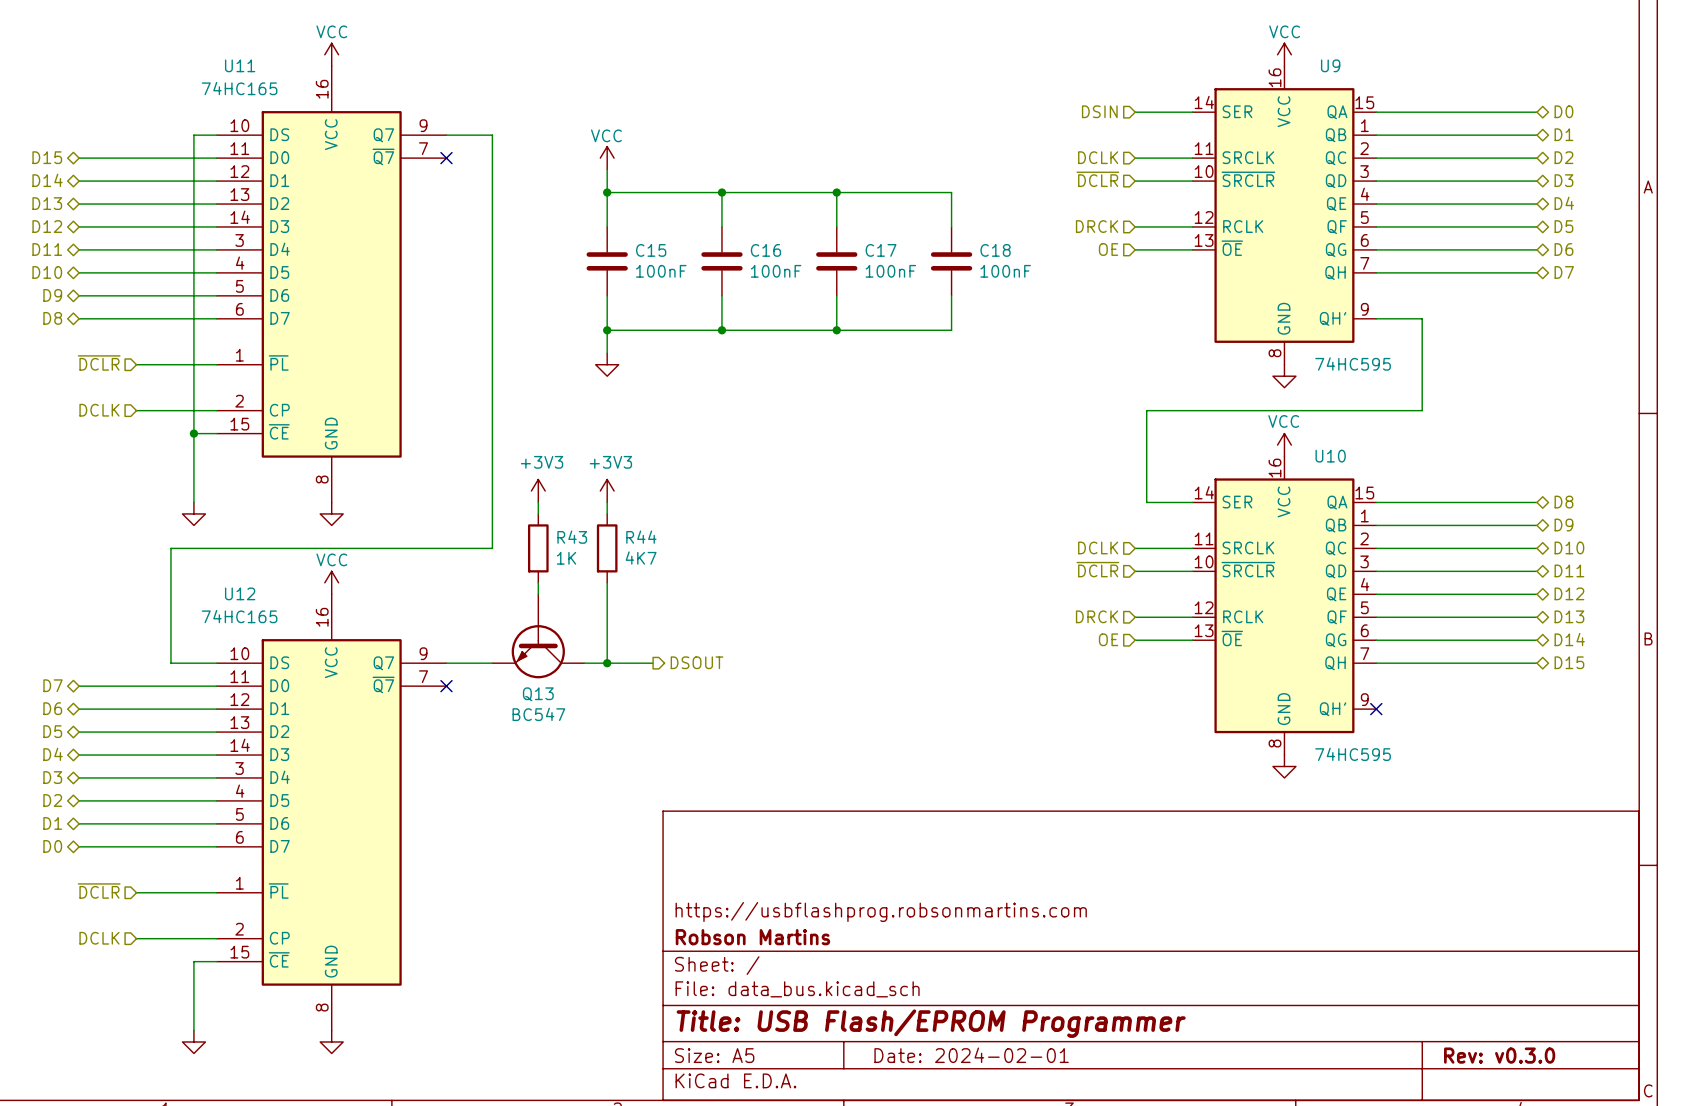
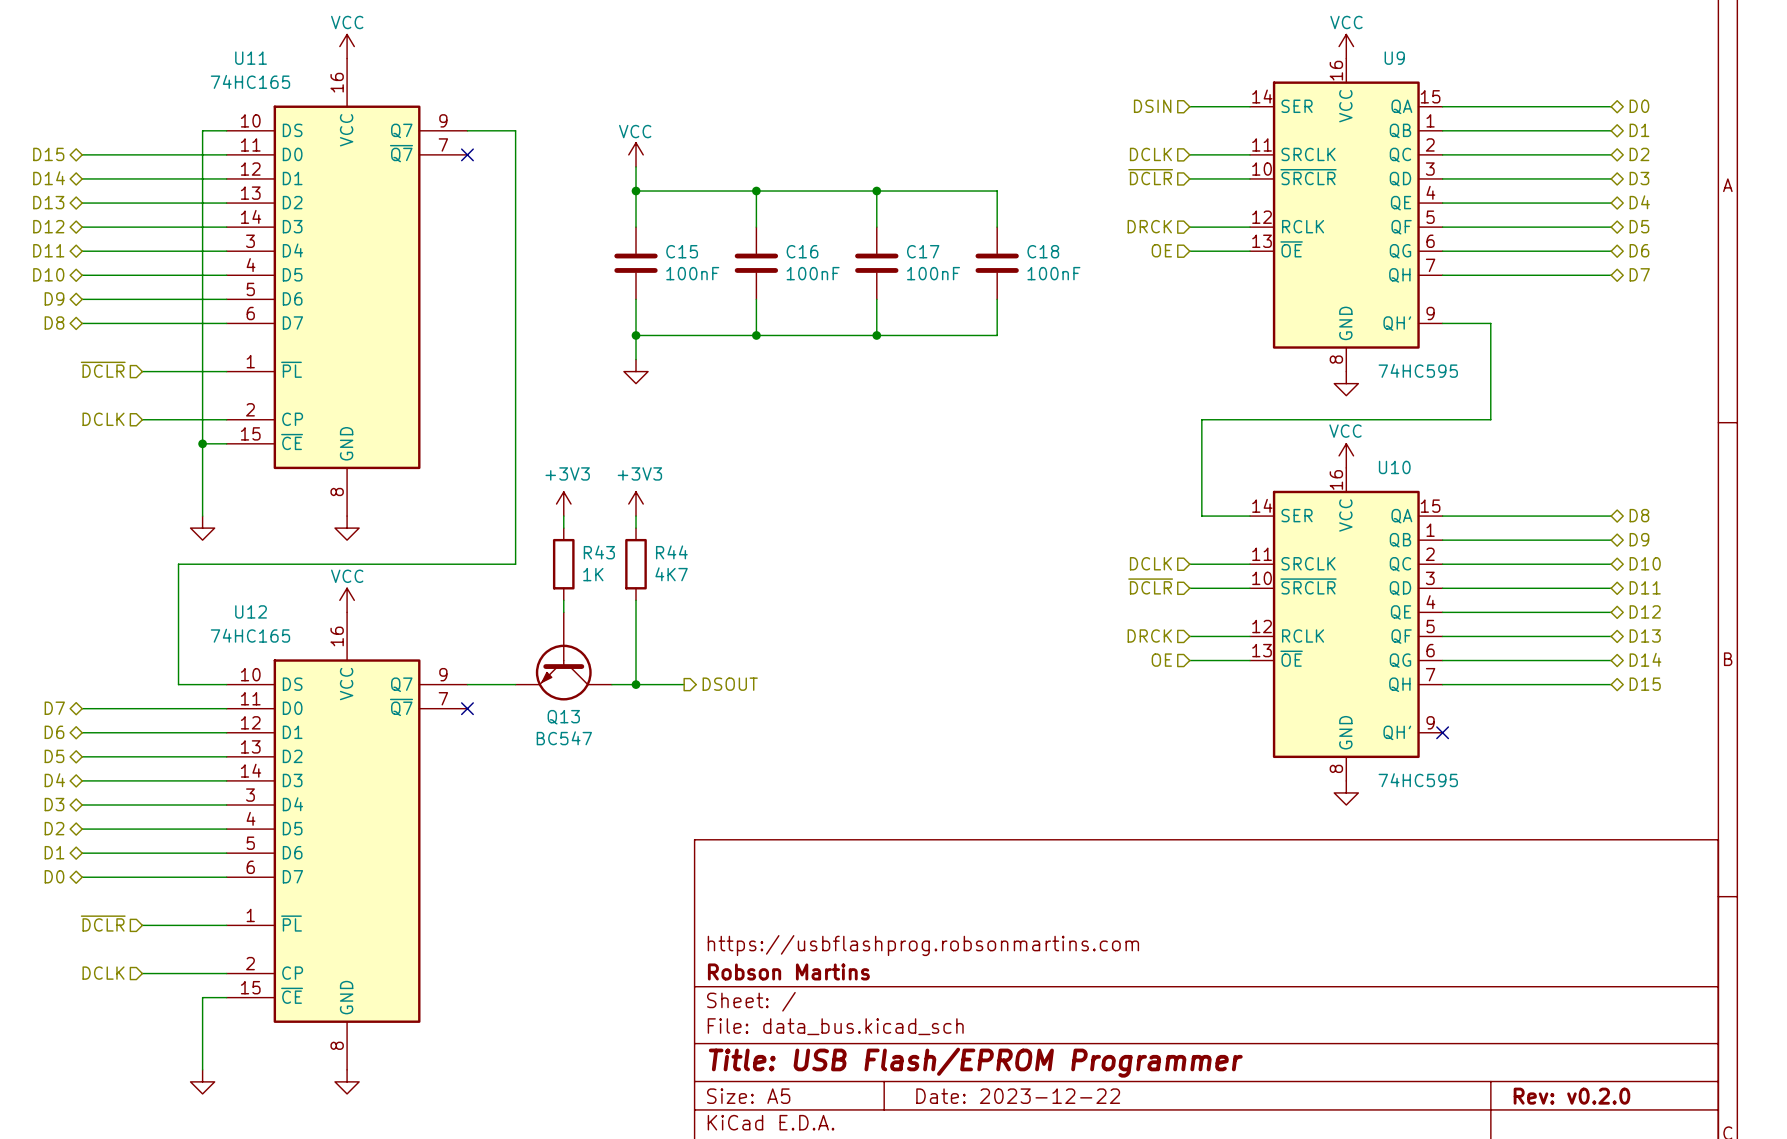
title block: Date: 2024-02-01 (971, 1055) -> Date: 2023-12-22 (1018, 1096)
title block: Rev: v0.3.0 (1499, 1055) -> Rev: v0.2.0 (1571, 1096)

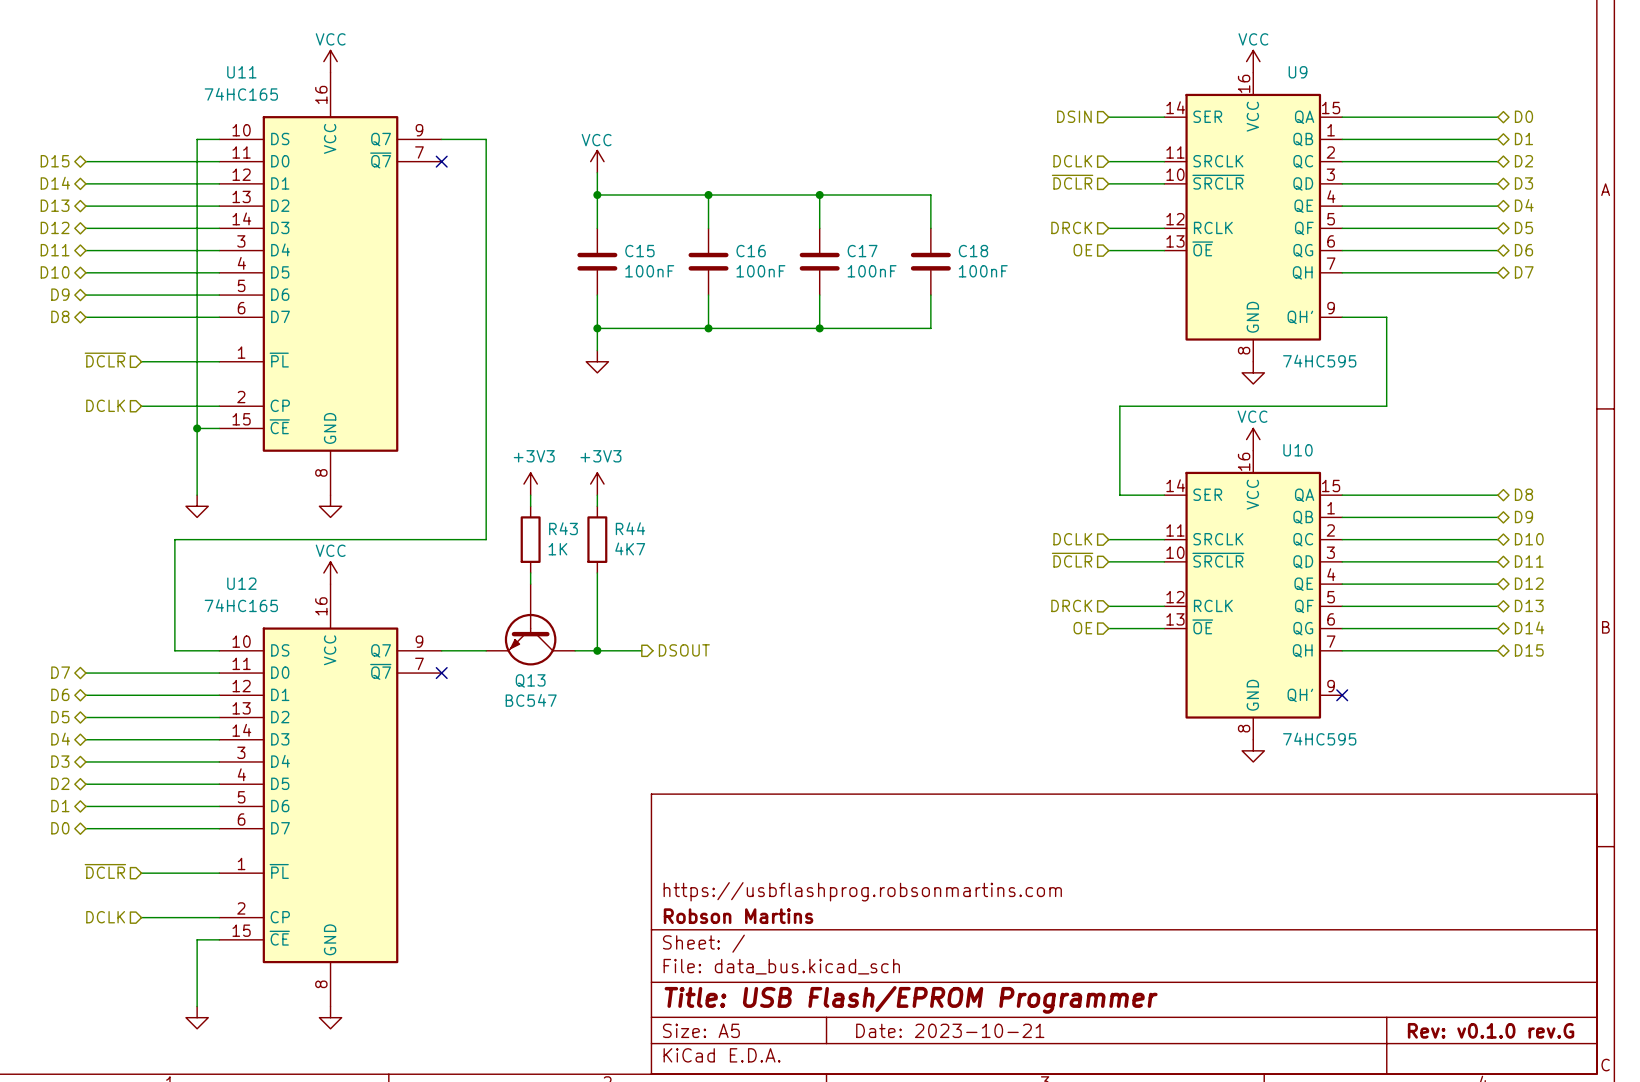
title block: Date: 2023-12-22 (1018, 1096) -> Date: 2023-10-21 (950, 1030)
title block: Rev: v0.2.0 (1571, 1096) -> Rev: v0.1.0 rev.G (1491, 1030)

